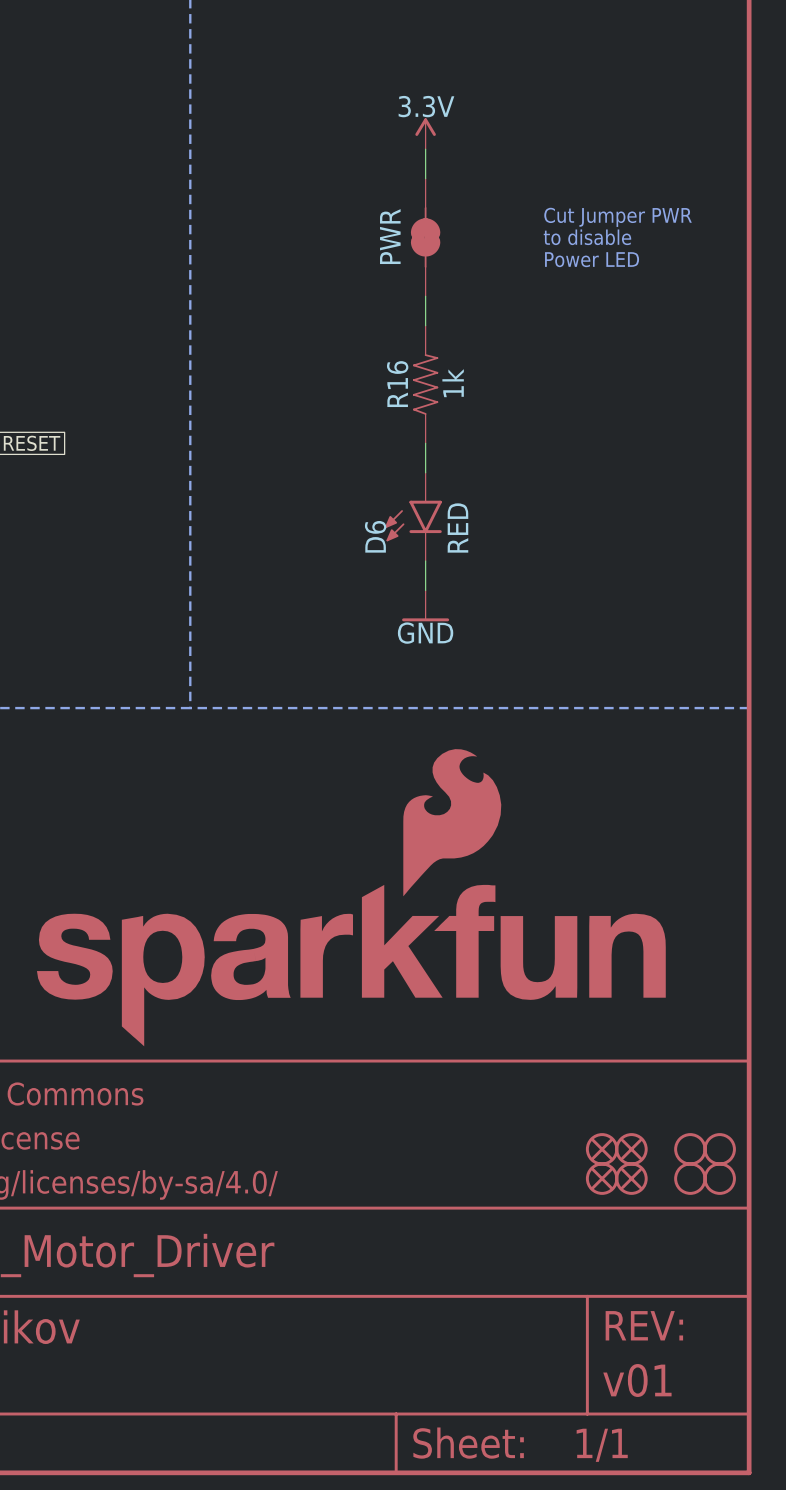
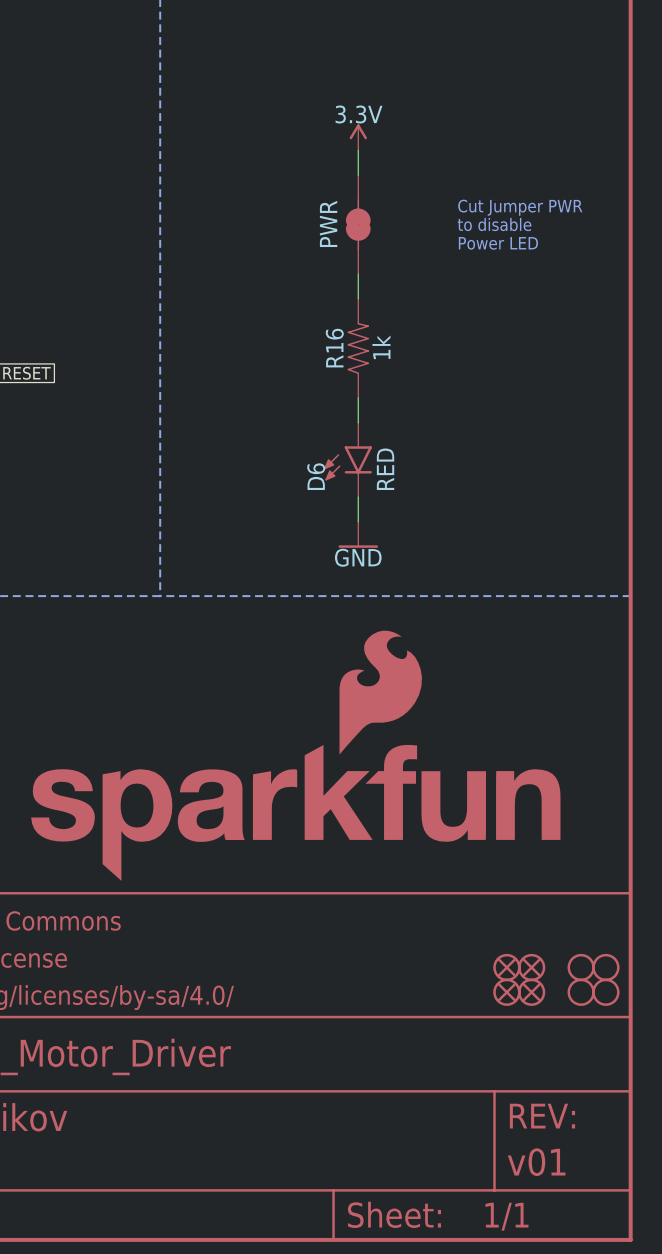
power symbol position: 3.3V (425, 133) -> 3.3V (358, 137)
text position: Cut Jumper PWR (618, 217) -> Cut Jumper PWR (520, 207)
PWR position: (425, 237) -> (358, 224)
text position: to disable (587, 237) -> to disable (494, 224)
text position: Power LED (592, 259) -> Power LED (498, 243)
R16 position: (425, 384) -> (358, 348)
D6 position: (413, 516) -> (348, 459)
power symbol position: GND (425, 605) -> GND (358, 534)

